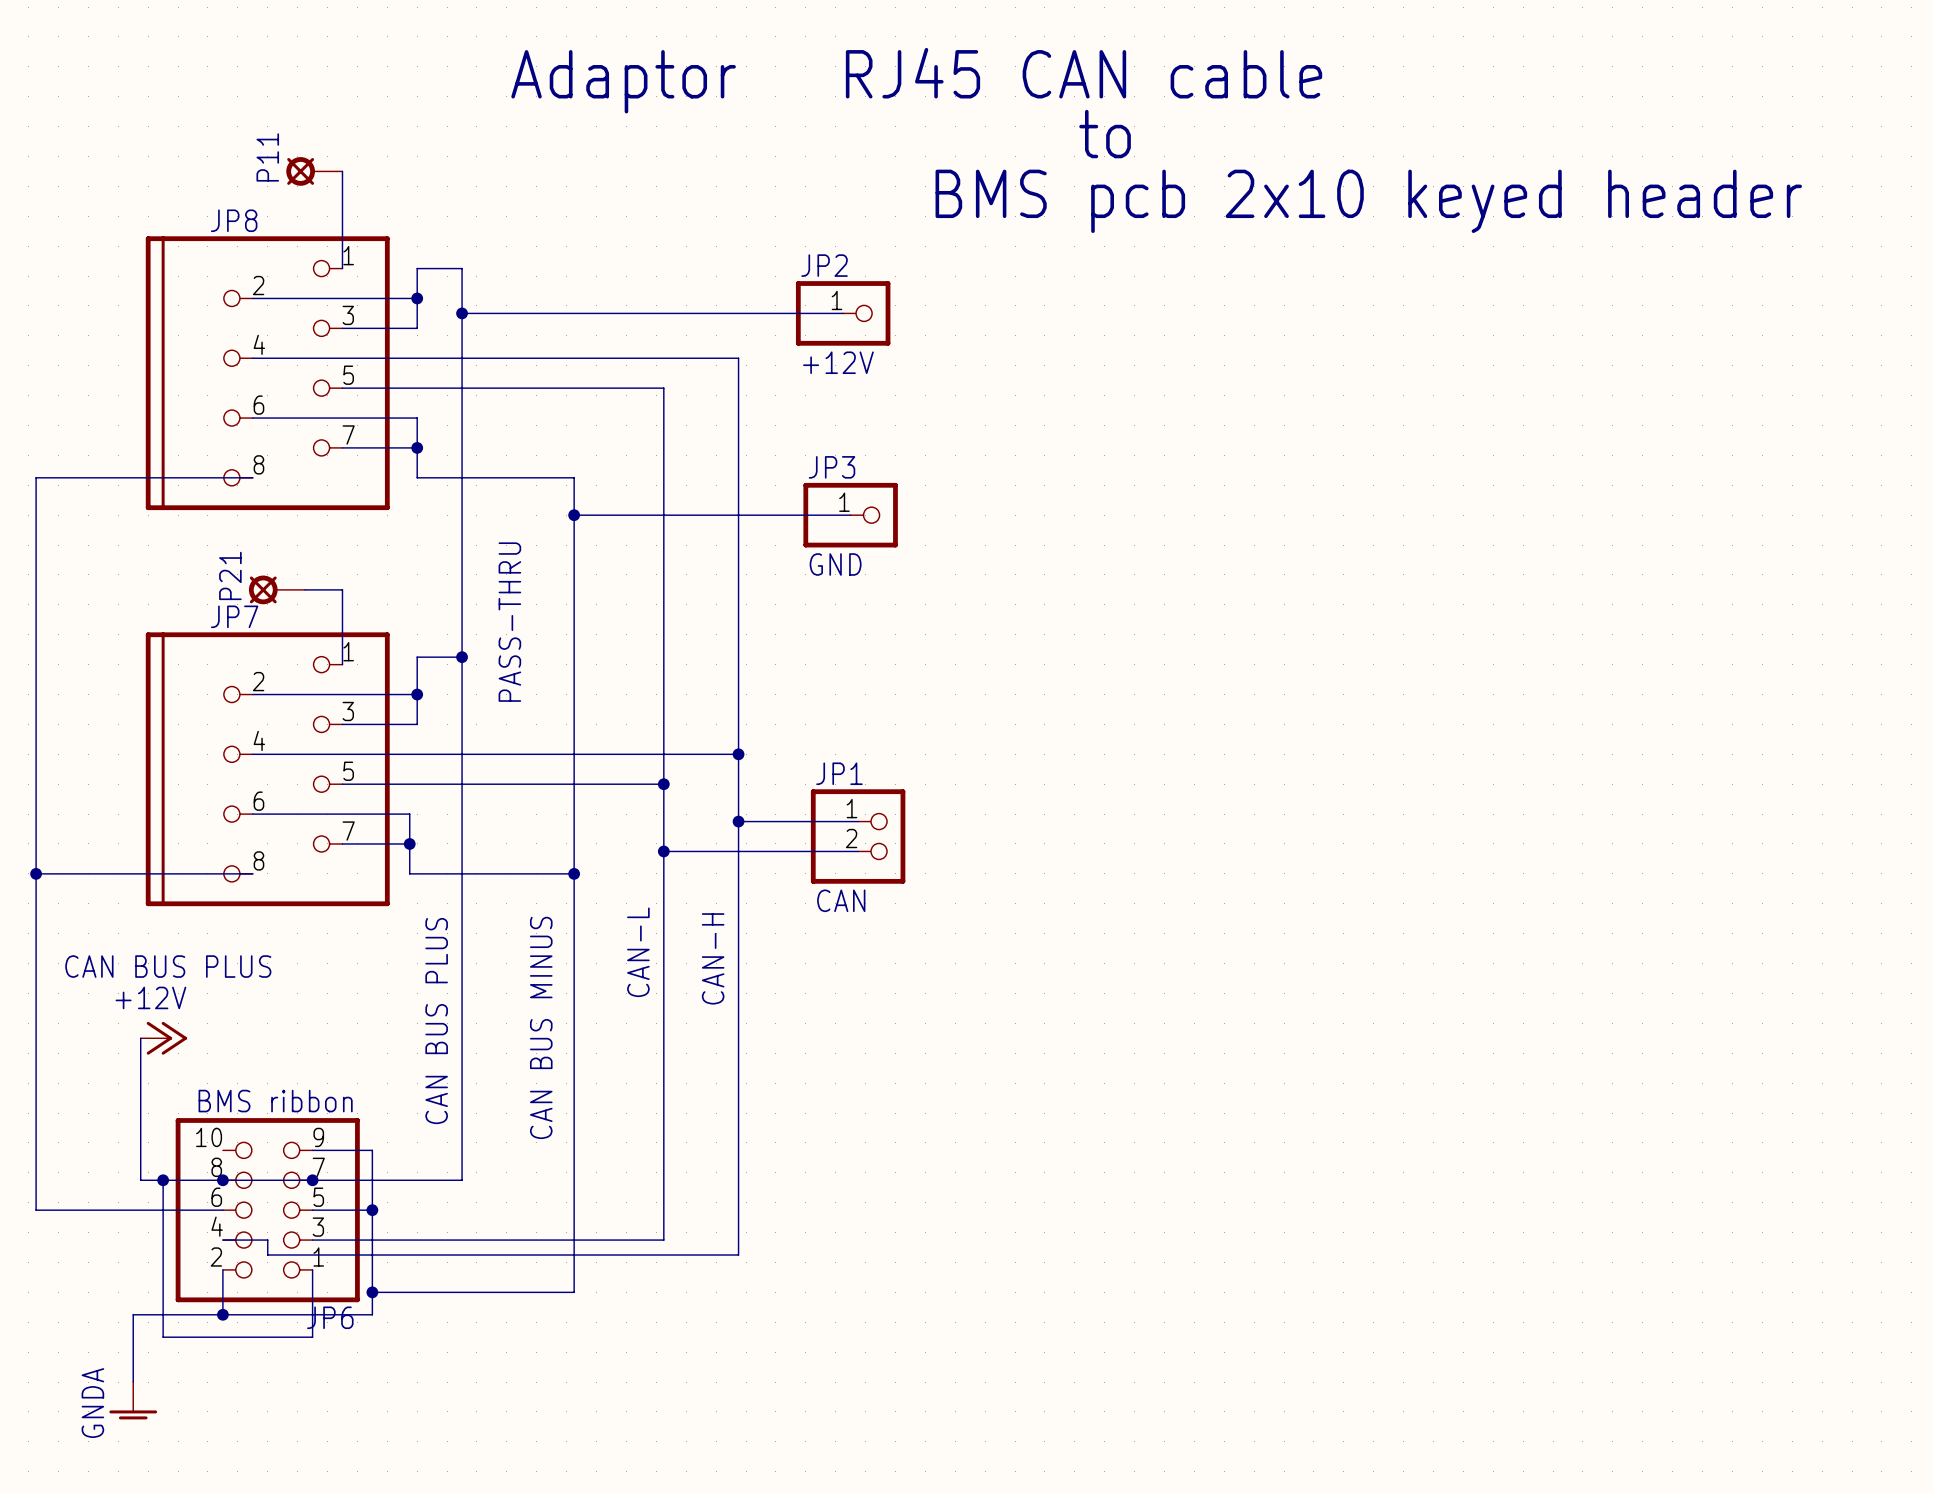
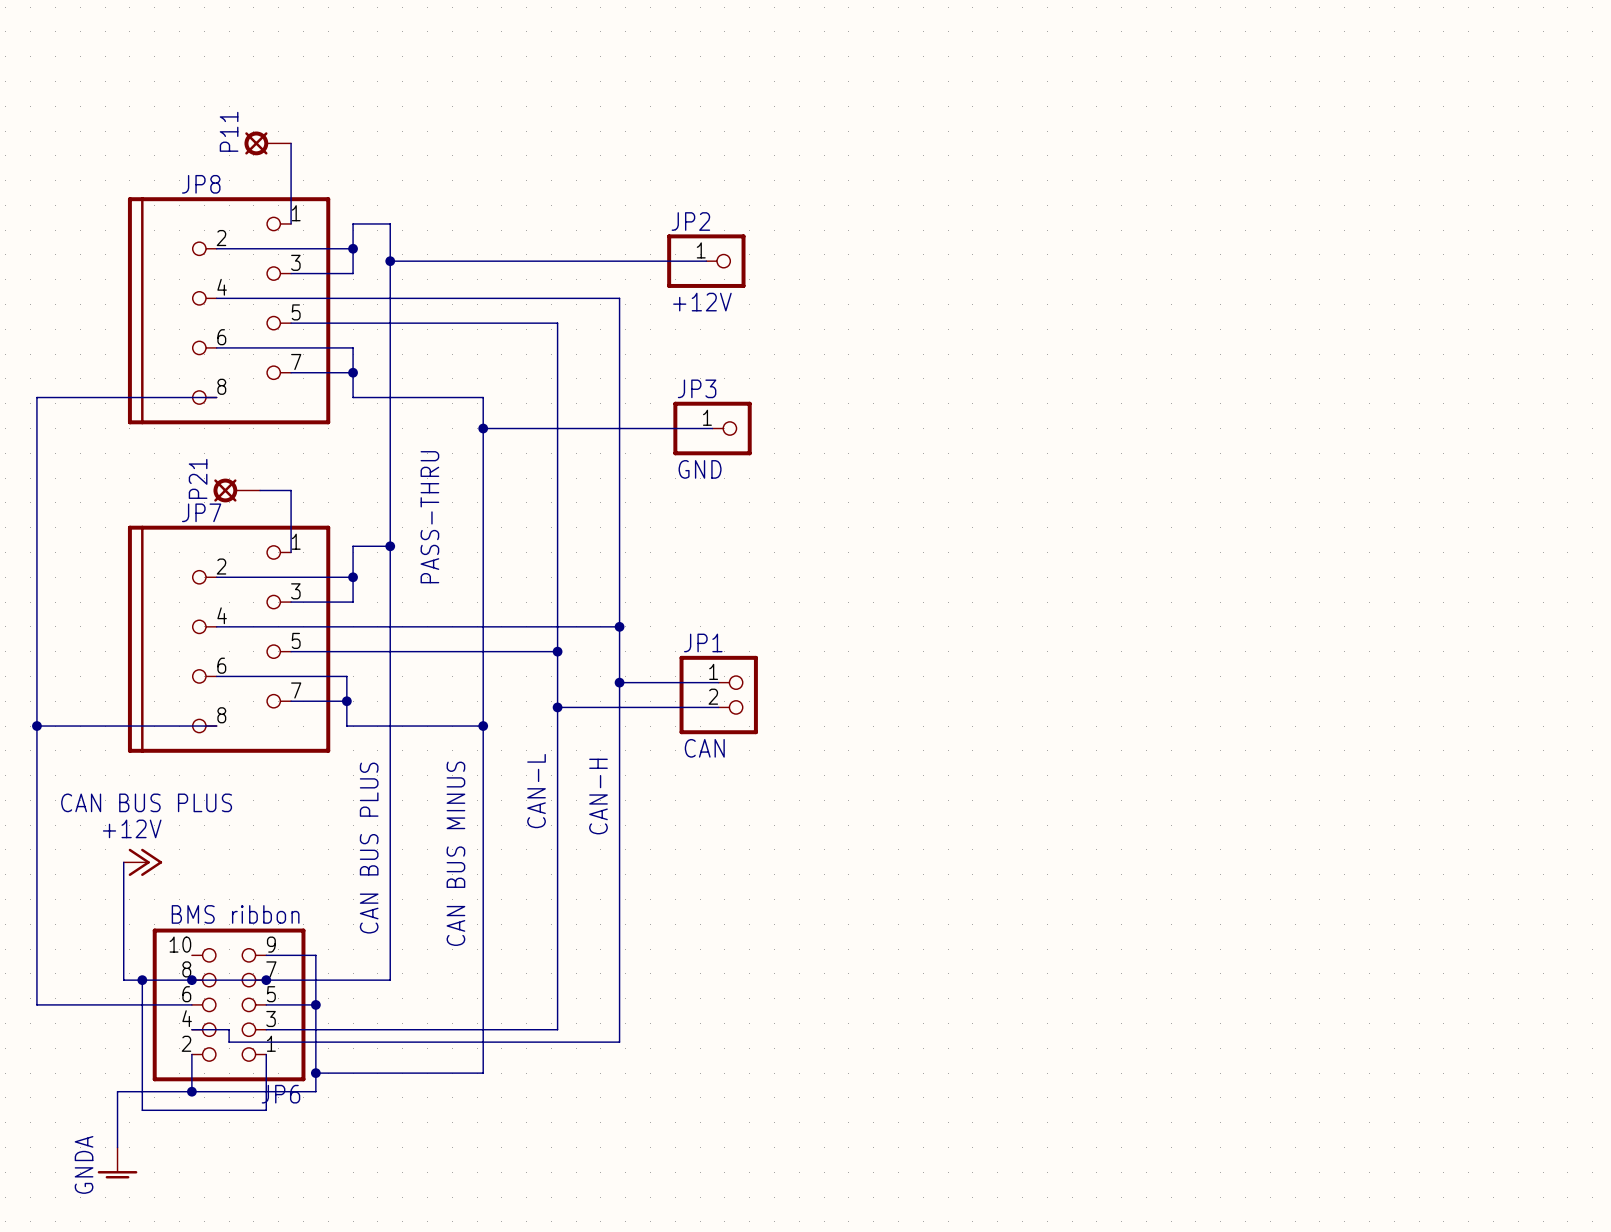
text: RJ45 CAN cable (1084, 73) -> none
text: Adaptor (623, 81) -> none
text: to (1105, 134) -> none
text: BMS pcb 2x10 keyed header (1368, 201) -> none

